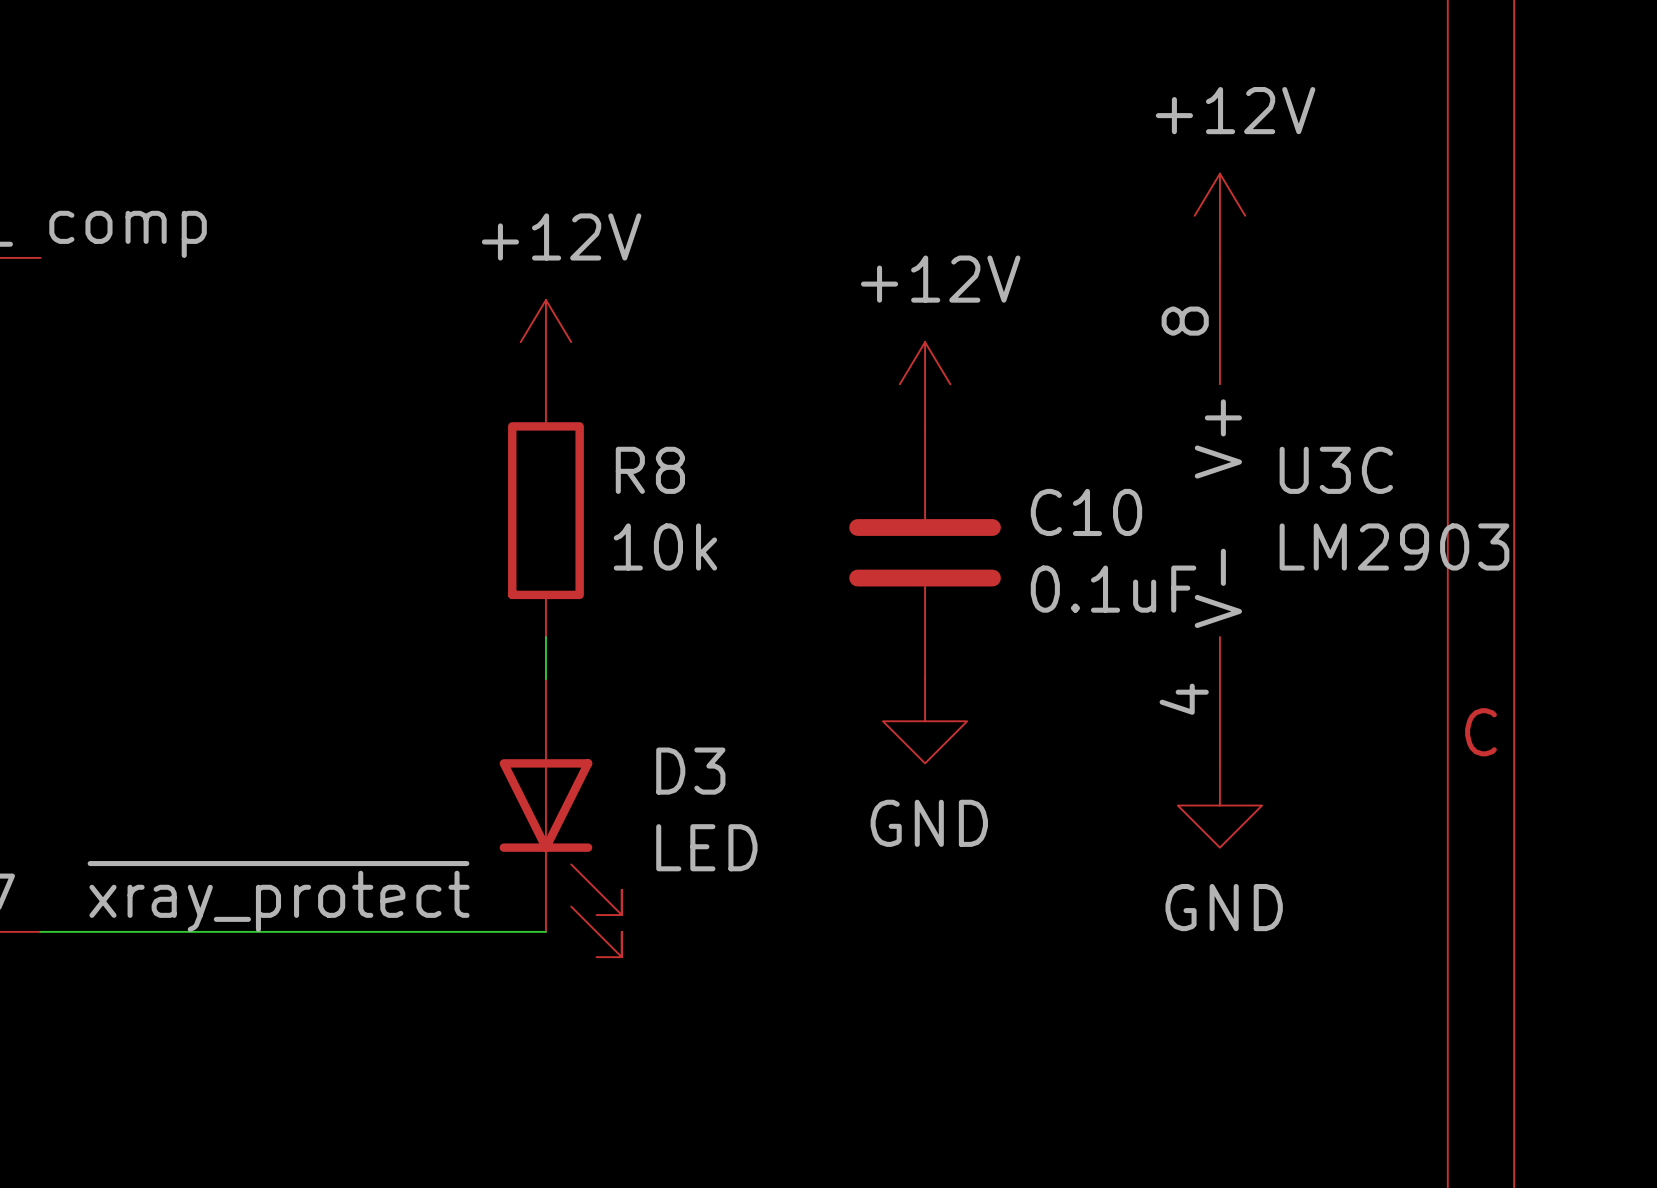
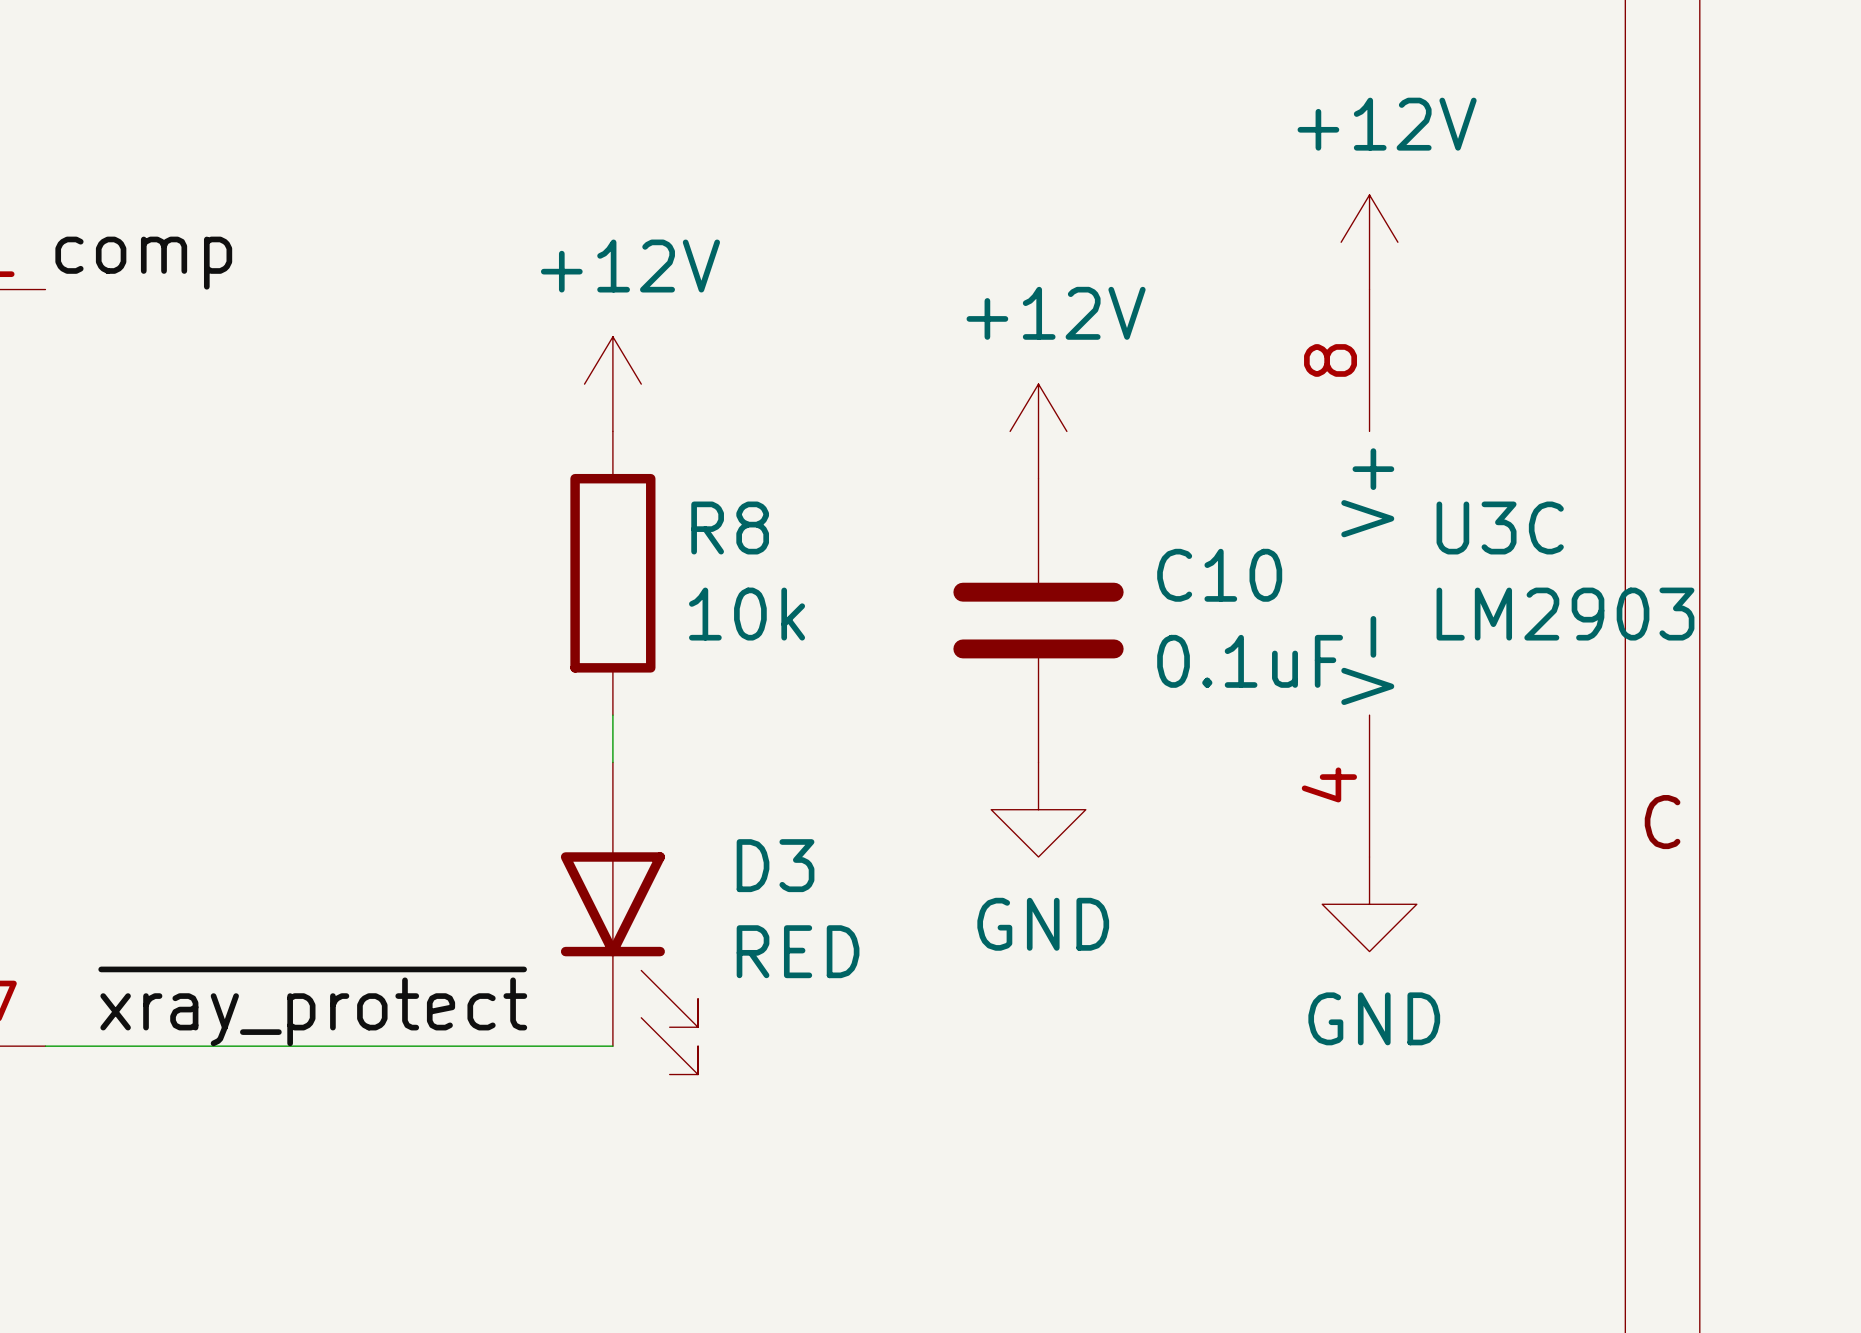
D3 value: LED (706, 847) -> RED (798, 951)

